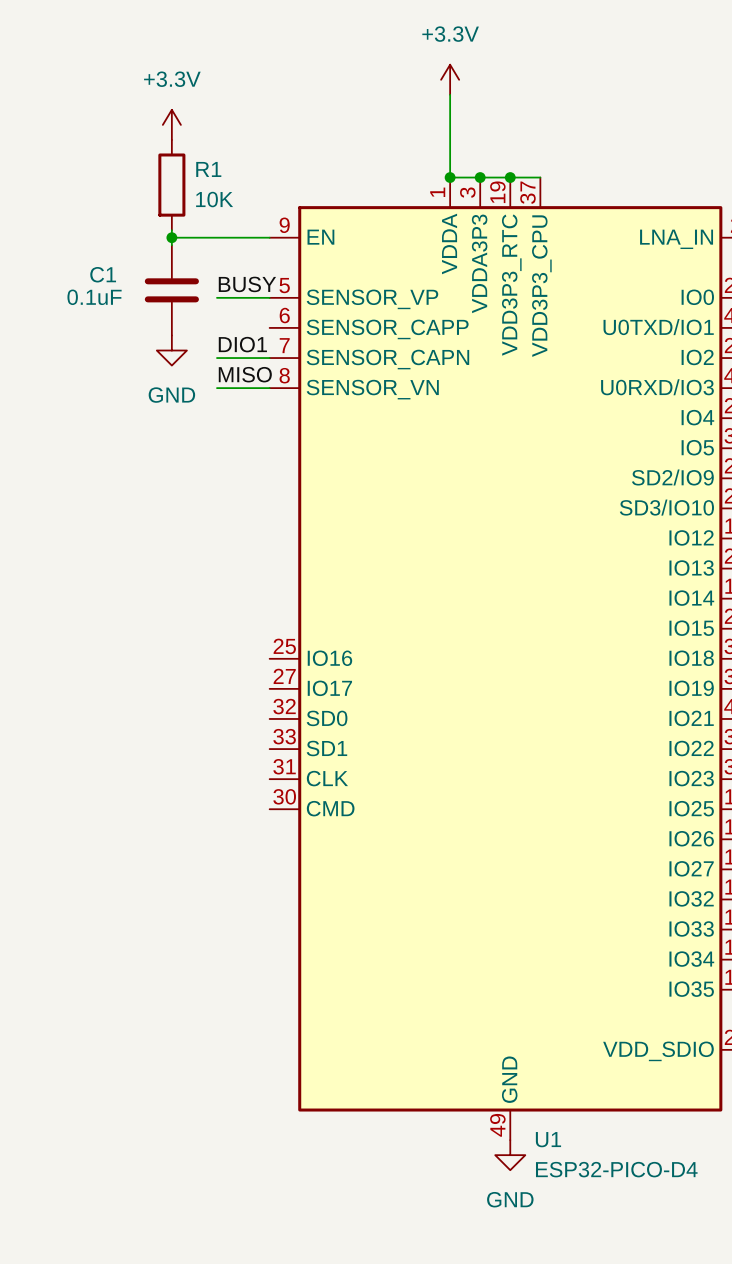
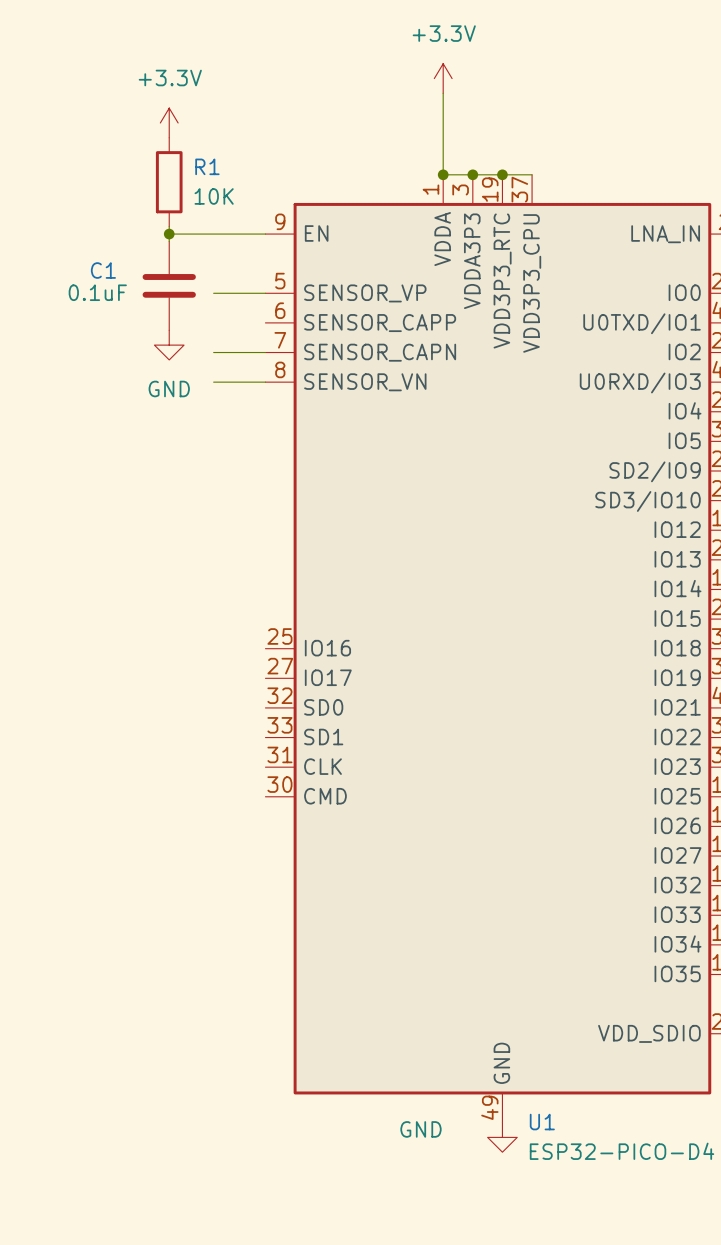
label: BUSY (247, 284) -> none
label: DIO1 (242, 344) -> none
label: MISO (245, 374) -> none
power symbol text position: GND (510, 1199) -> GND (420, 1129)

